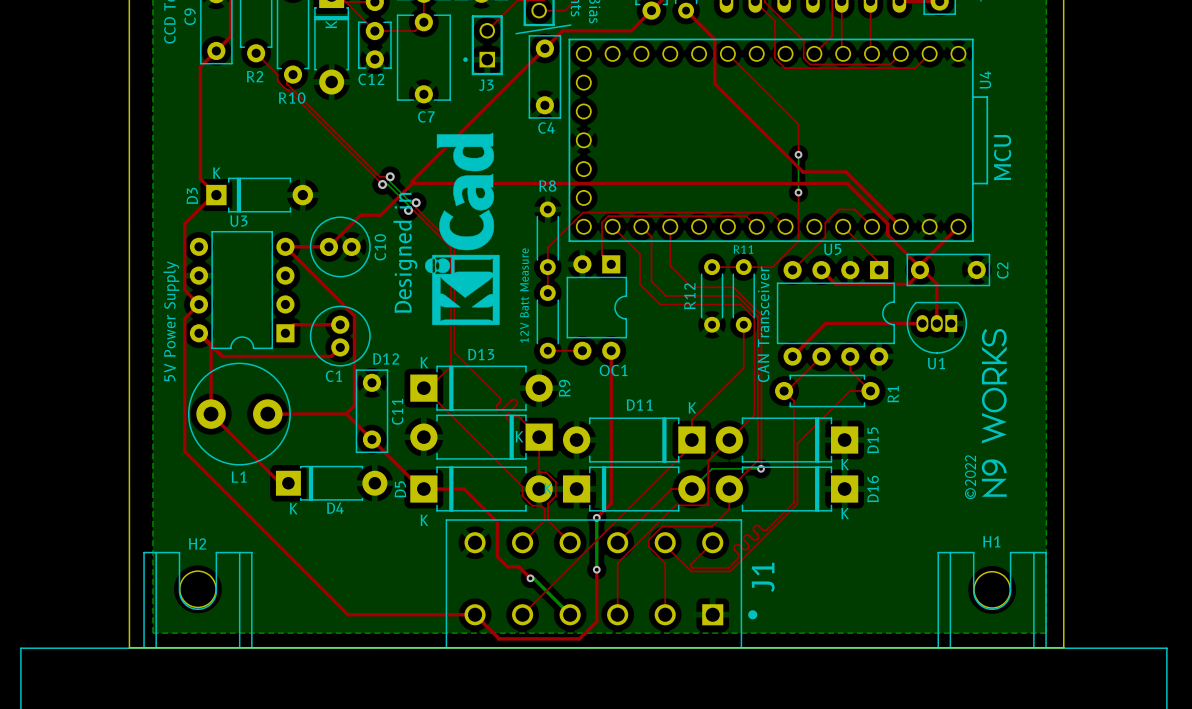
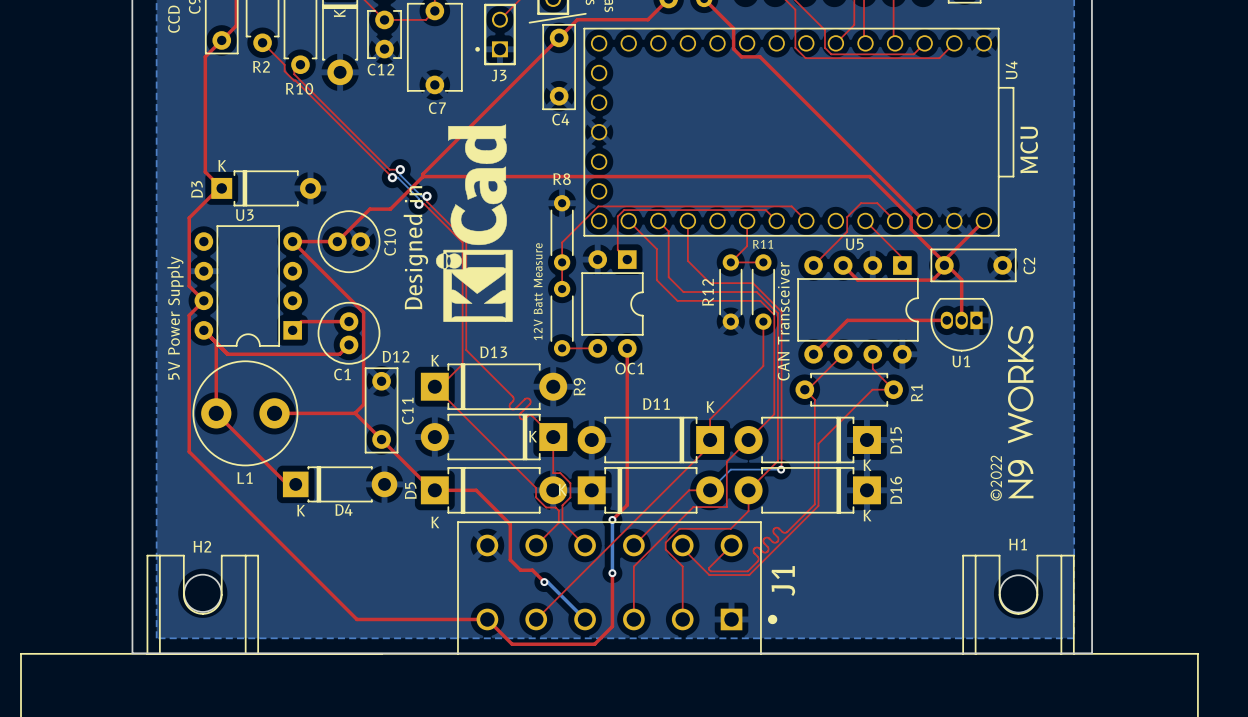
top track: (727, 53) (798, 124) (798, 154) -> none
top track: (714, 59) (714, 83) (803, 172) (846, 172) (900, 226) -> (733, 48) (741, 56) (759, 56) (924, 220)
bottom track: (798, 154) (798, 192) -> none
via: (798, 154) -> none
top track: (798, 192) (798, 241) (772, 267) (743, 267) -> none
via: (798, 192) -> none
top track: none -> (747, 220) (747, 246) (730, 262)

